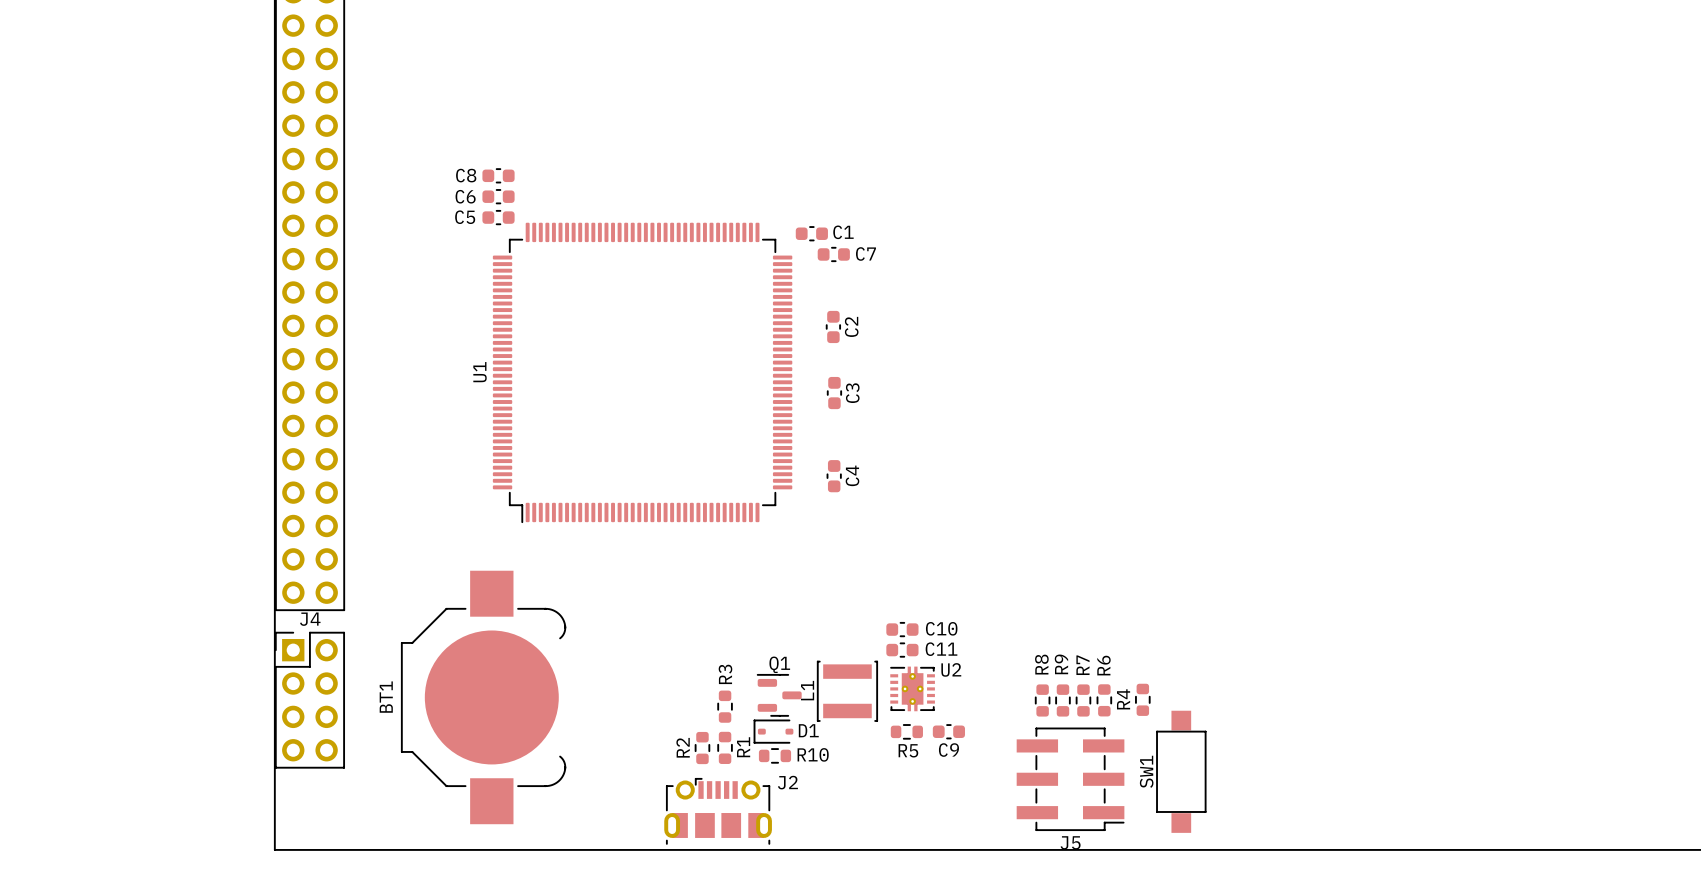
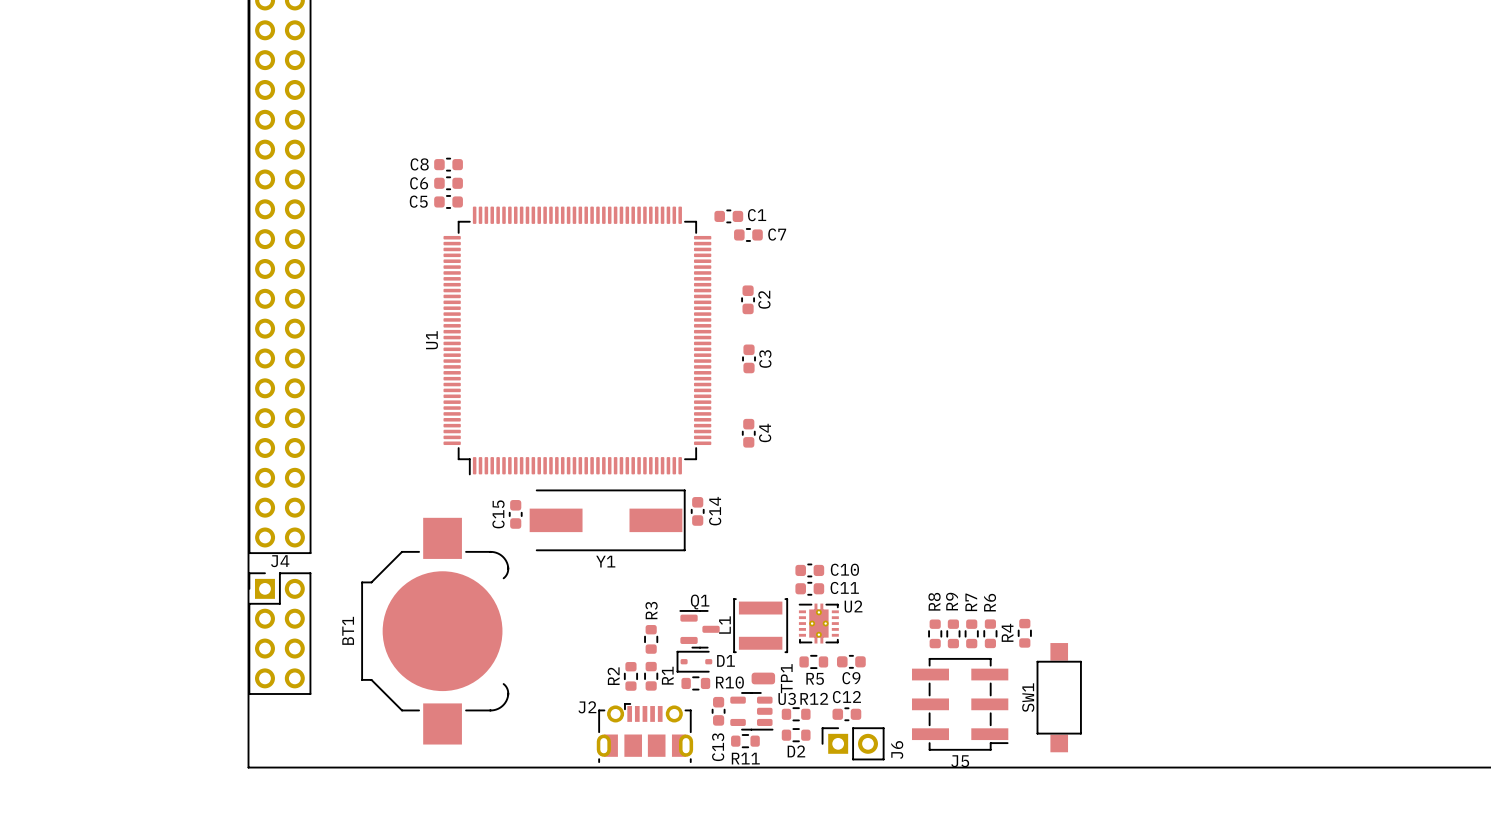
C14: none -> (697, 511)
C15: none -> (515, 514)
Y1: none -> (607, 520)
TP1: none -> (763, 678)
J2 name position: J2 (787, 782) -> J2 (587, 707)
C13: none -> (718, 711)
U3: none -> (751, 711)
R12: none -> (796, 714)
C12: none -> (846, 714)
D2: none -> (796, 735)
R11: none -> (745, 741)
J6: none -> (853, 743)

